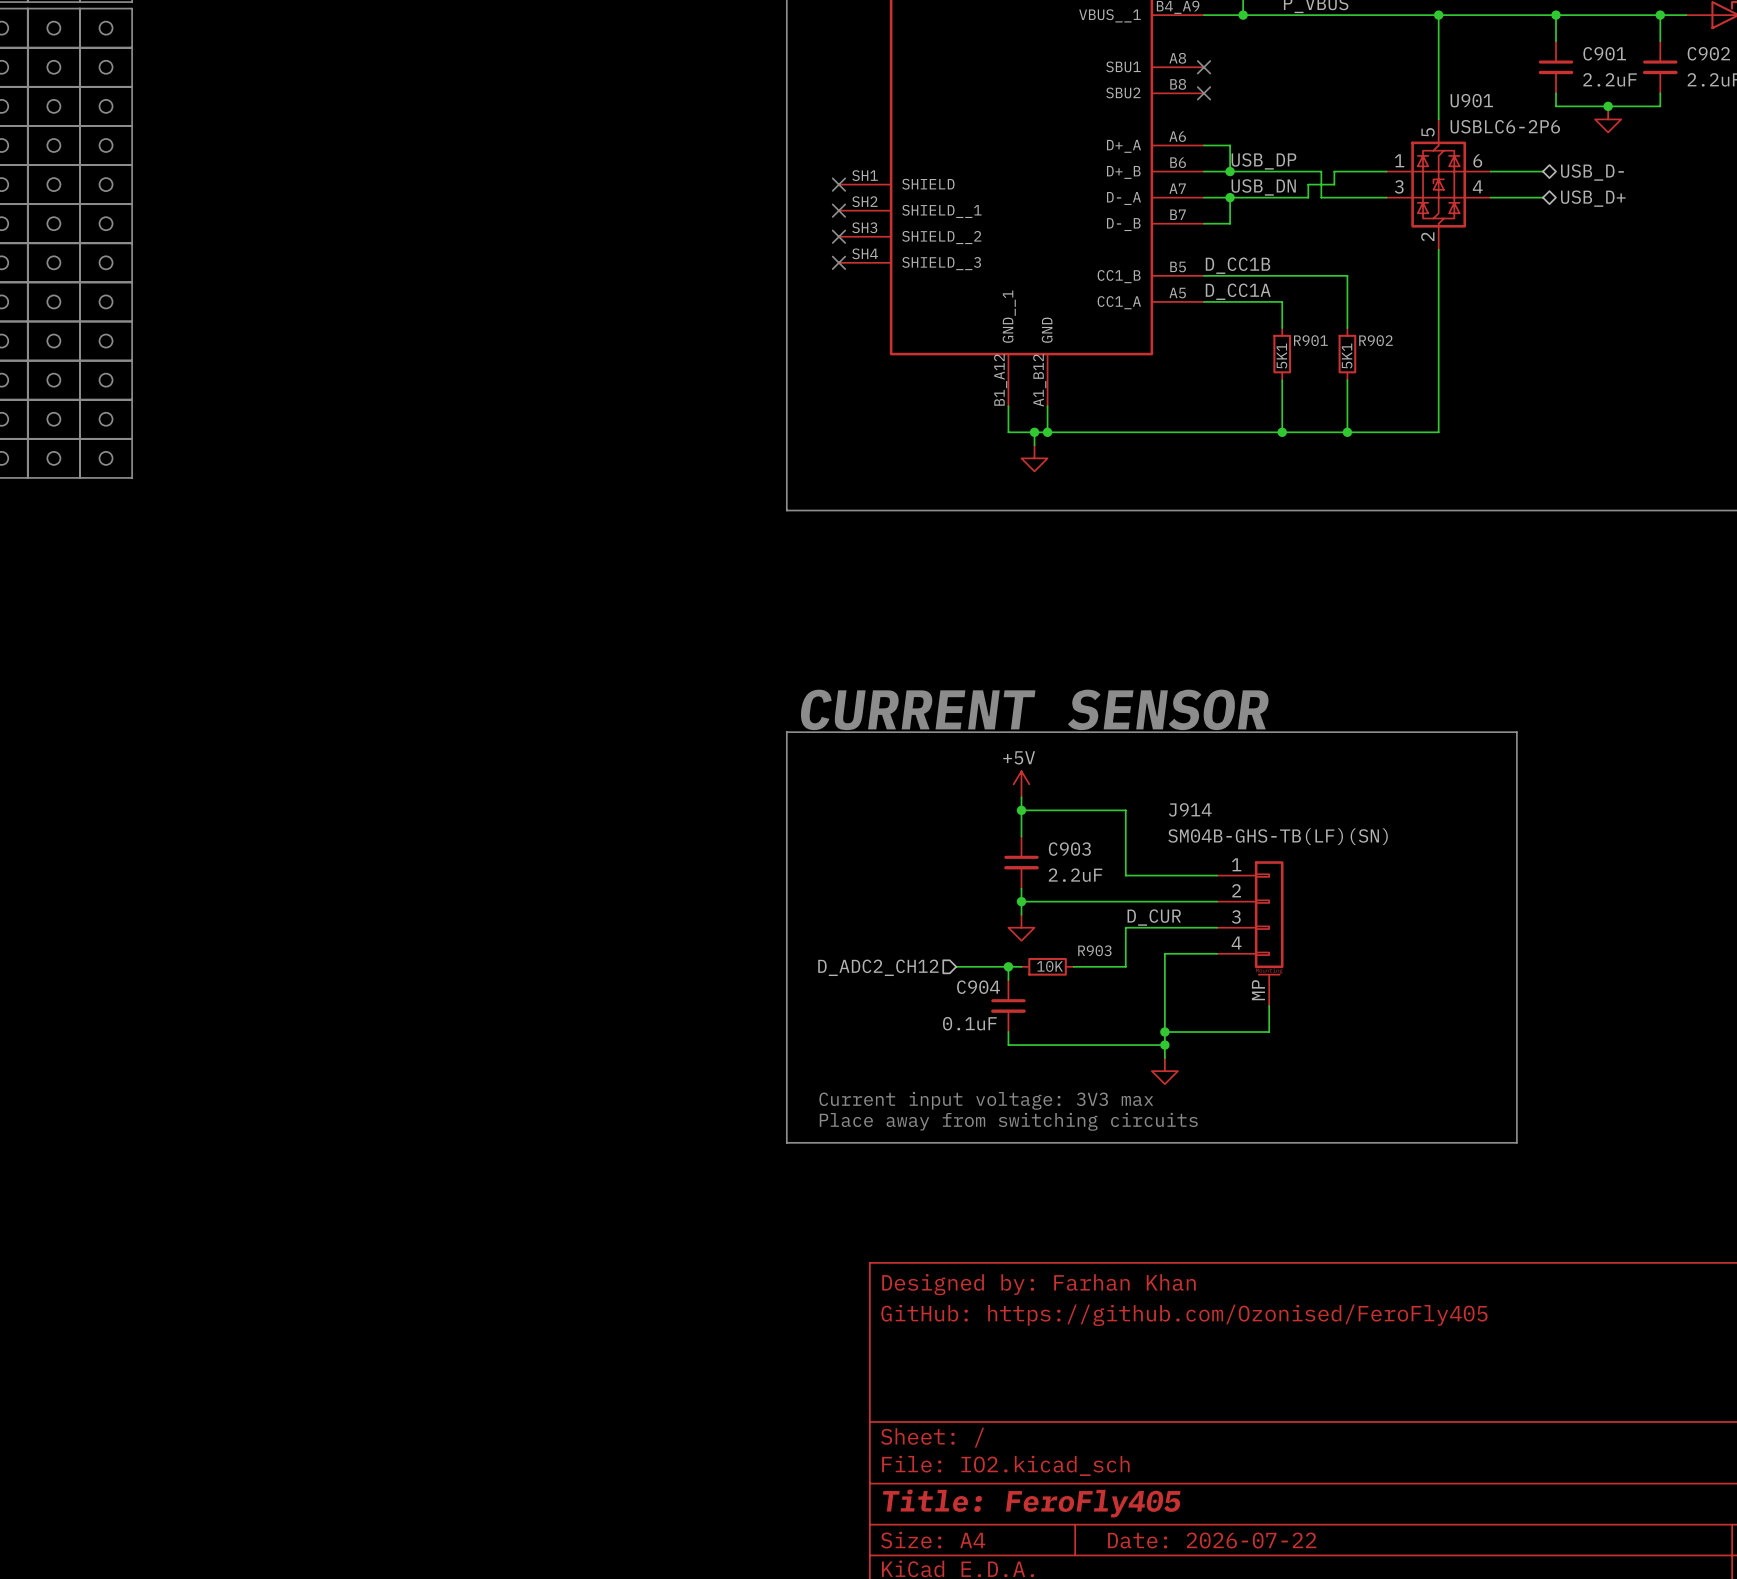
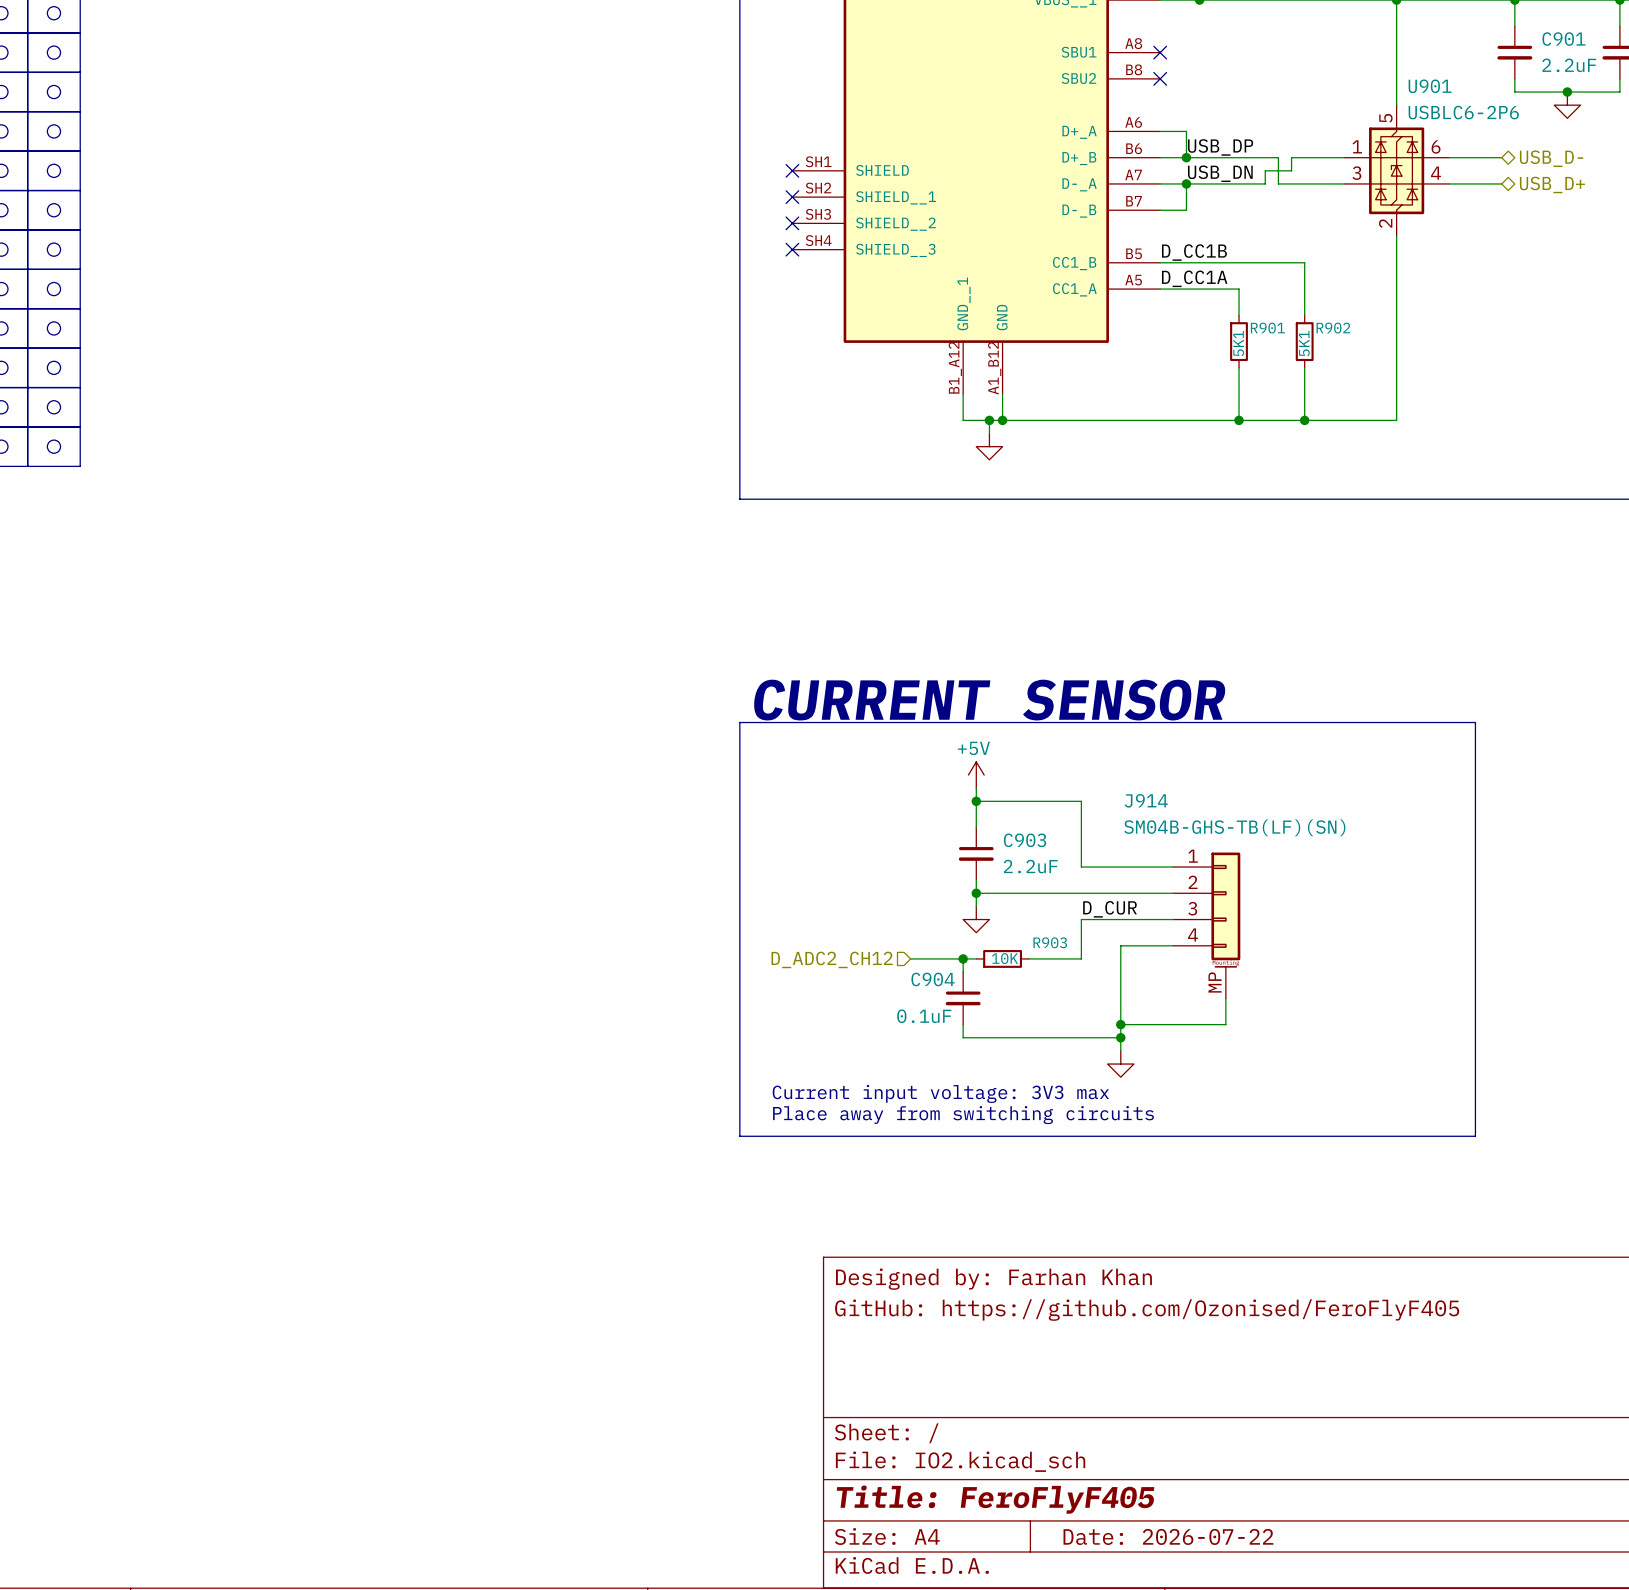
title block: GitHub: https://github.com/Ozonised/FeroFly405 (1184, 1315) -> GitHub: https://github.com/Ozonised/FeroFlyF405 (1147, 1310)
title block: Title: FeroFly405 (1031, 1503) -> Title: FeroFlyF405 (995, 1499)

